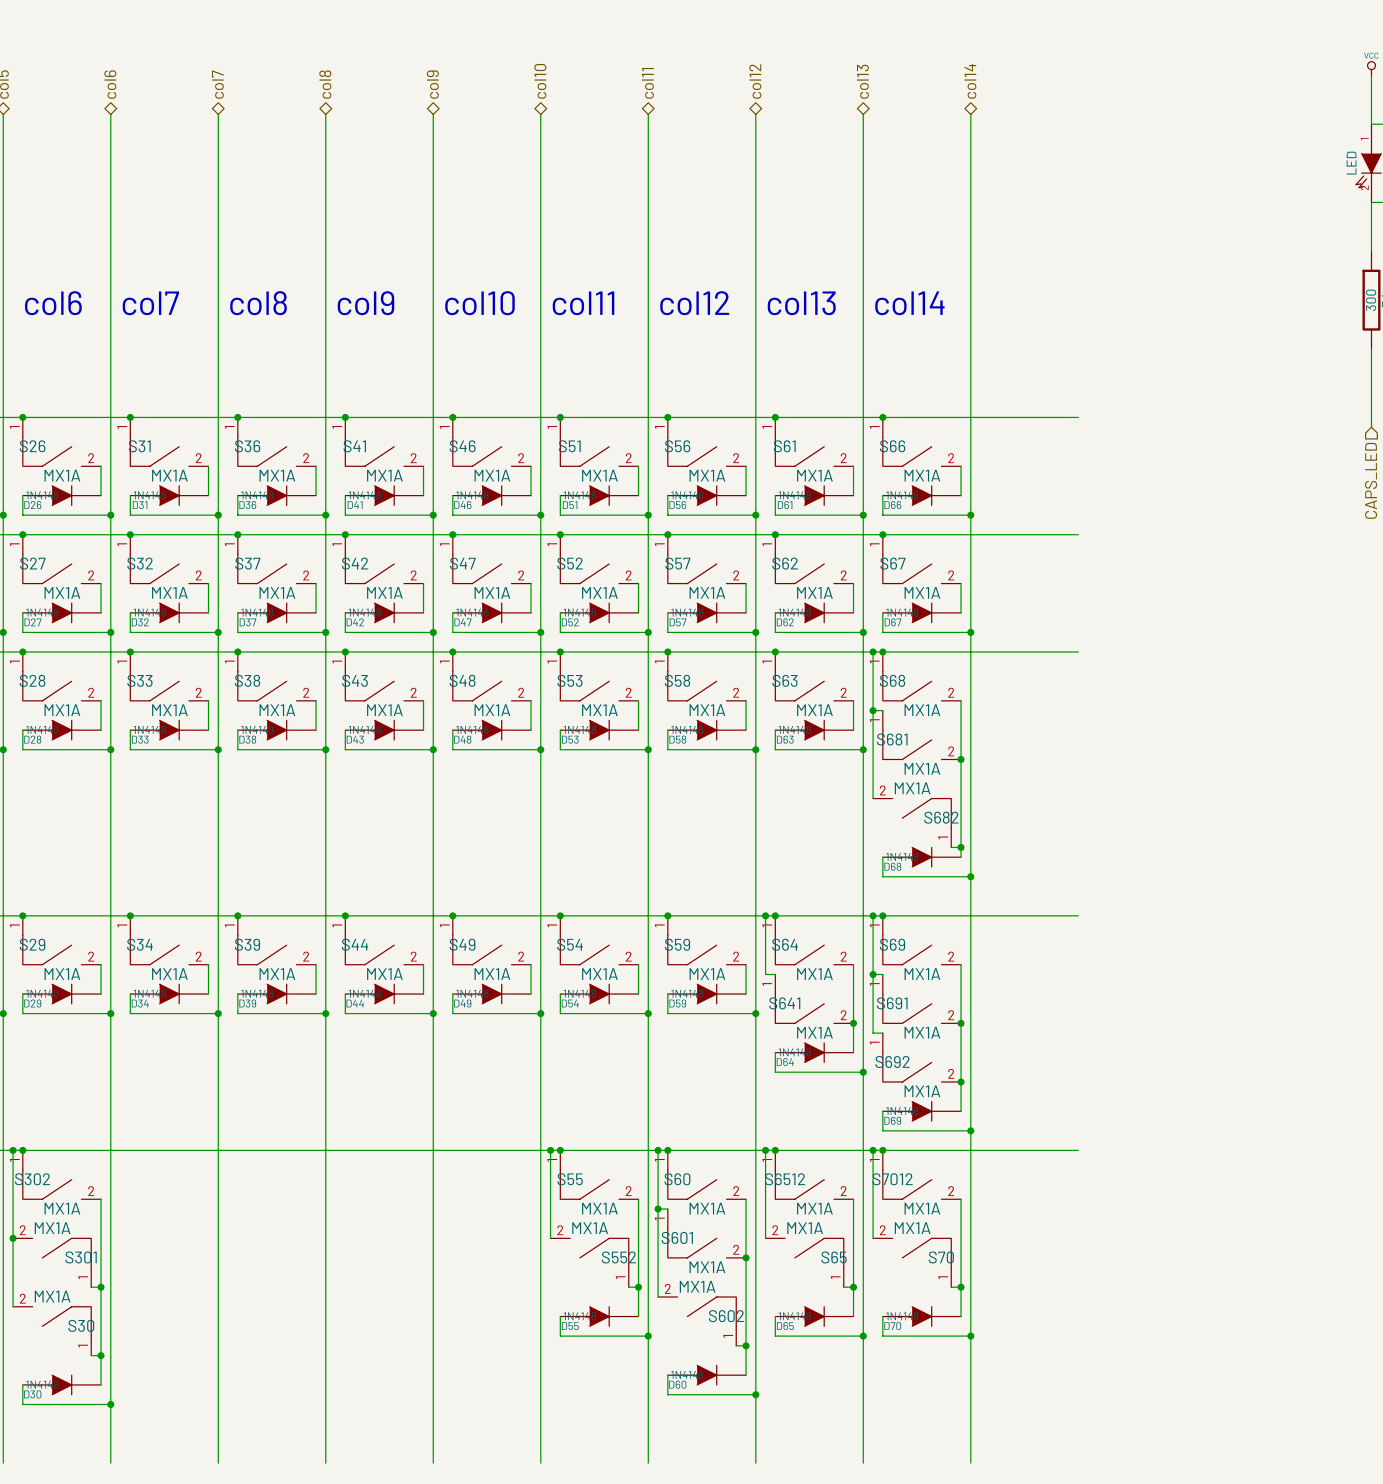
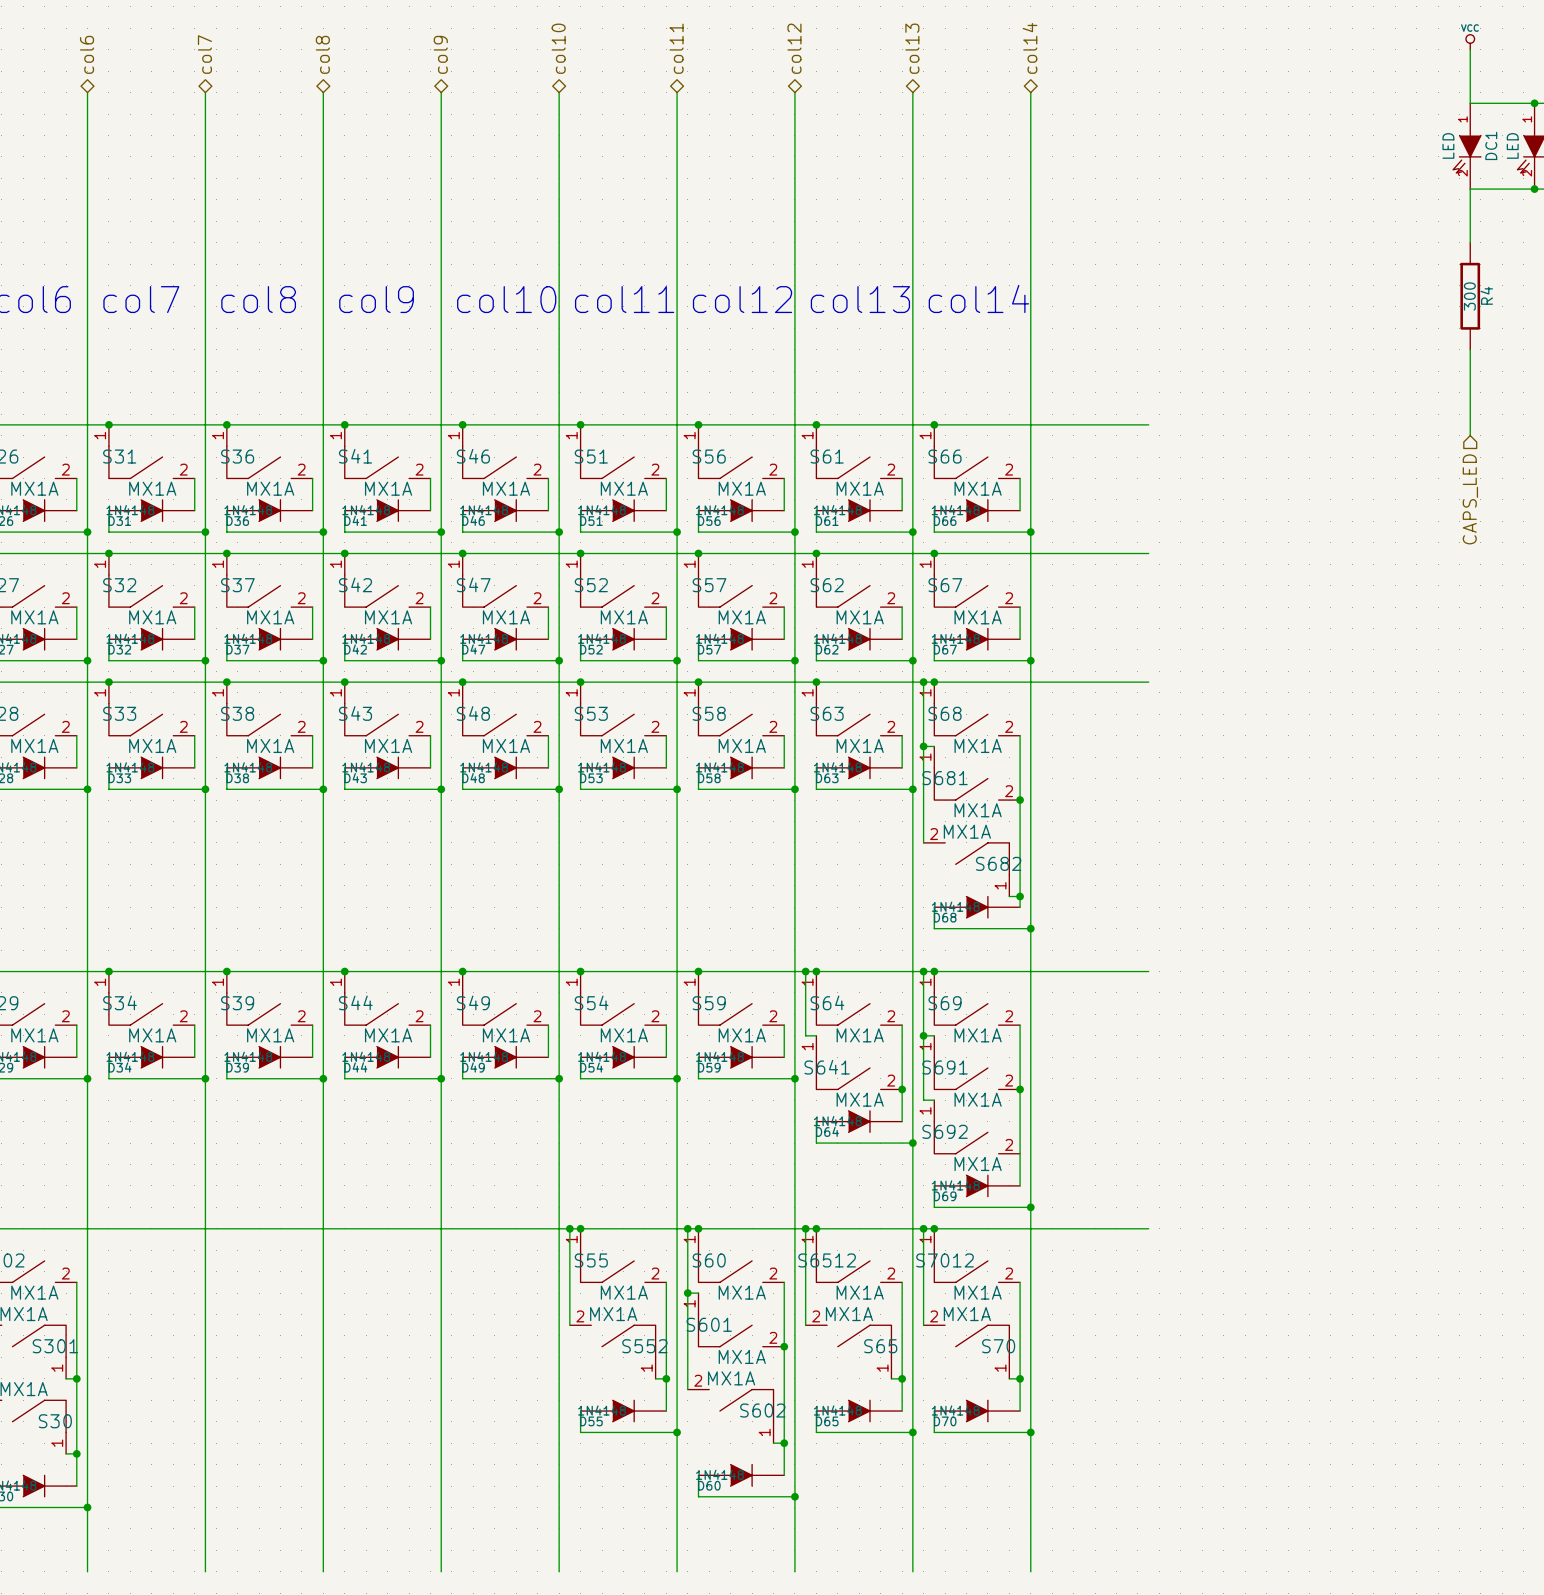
junction: (961, 1081) -> none

